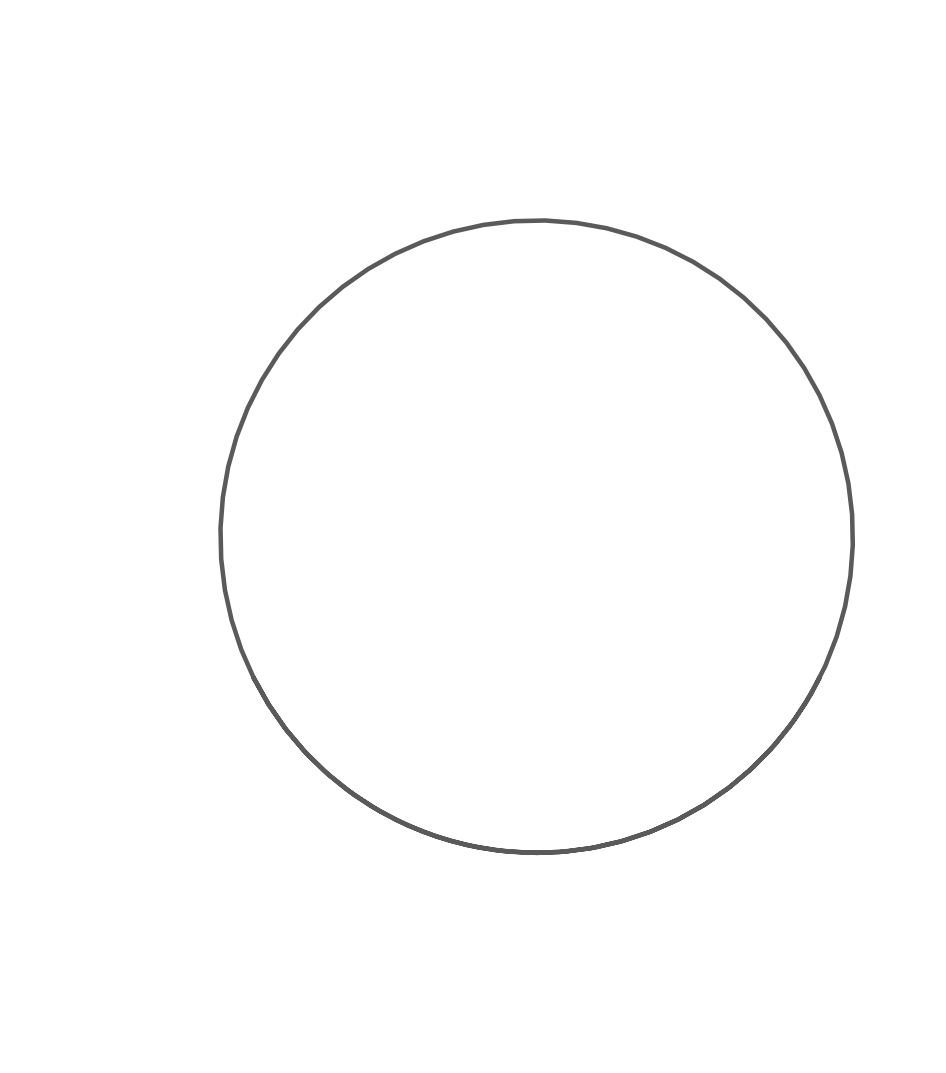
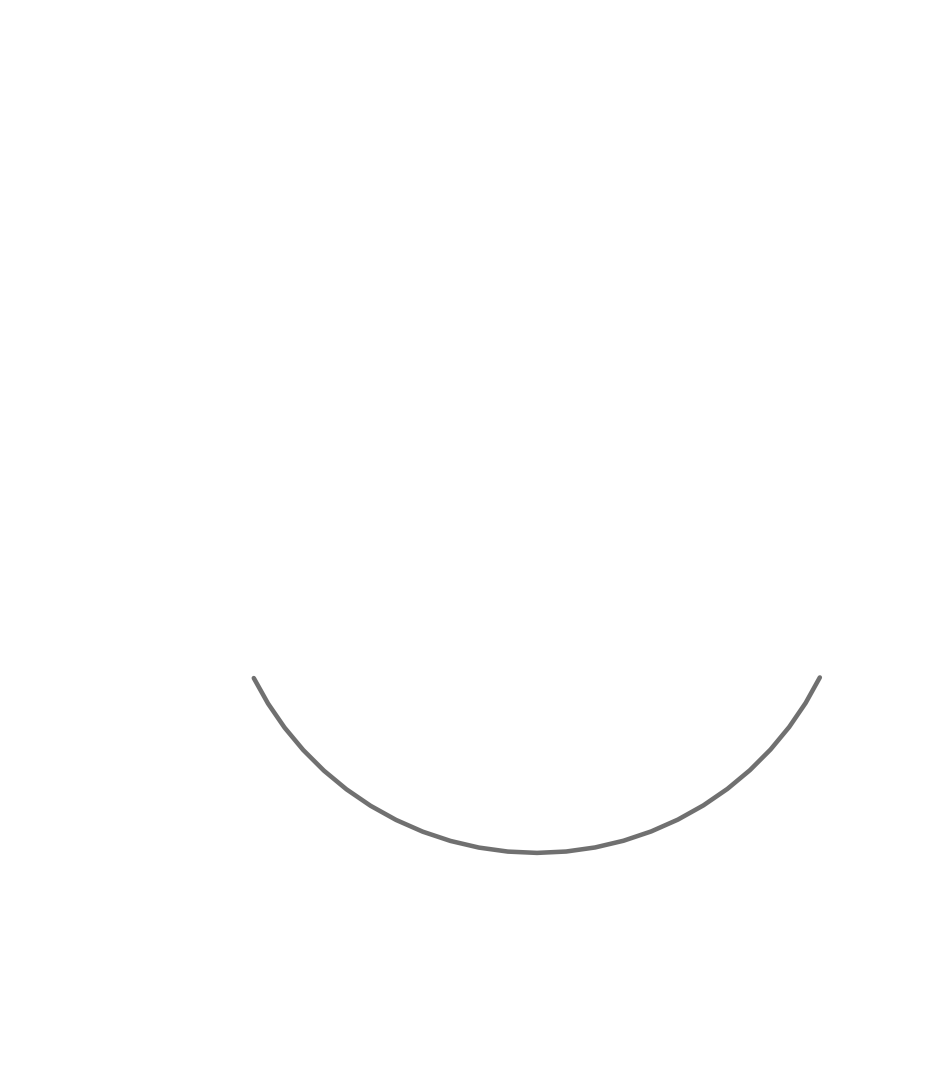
line: (253, 678) (241, 649) (231, 620) (224, 589) (221, 559) (220, 528) (222, 497) (228, 466) (236, 436) (247, 407) (261, 380) (278, 353) (297, 329) (319, 307) (342, 286) (368, 269) (395, 253) (423, 241) (453, 231) (483, 224) (514, 221) (545, 220) (576, 222) (606, 228) (636, 236) (665, 247) (693, 261) (719, 278) (743, 297) (766, 319) (786, 342) (804, 368) (819, 395) (832, 423) (841, 453) (848, 483) (852, 514) (852, 545) (850, 576) (845, 606) (836, 636) (825, 665) (811, 693) (794, 719) (775, 743) (754, 766) (730, 786) (705, 804) (678, 819) (649, 832) (620, 841) (589, 848) (559, 852) (528, 852) (497, 850) (466, 845) (436, 836) (407, 825) (380, 811) (353, 794) (329, 775) (307, 754) (286, 730) (269, 705) (253, 678) -> none

